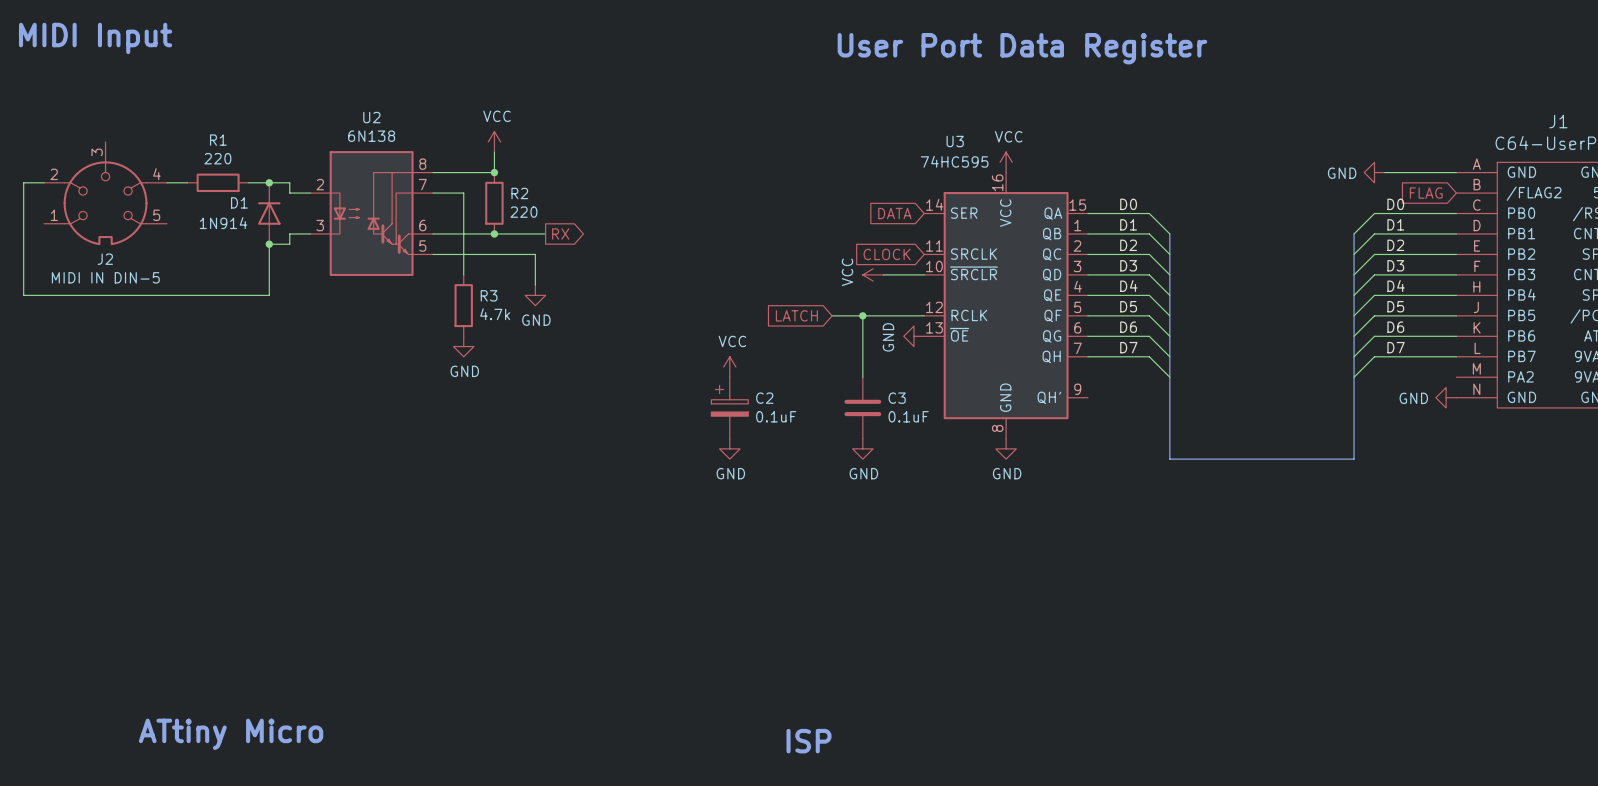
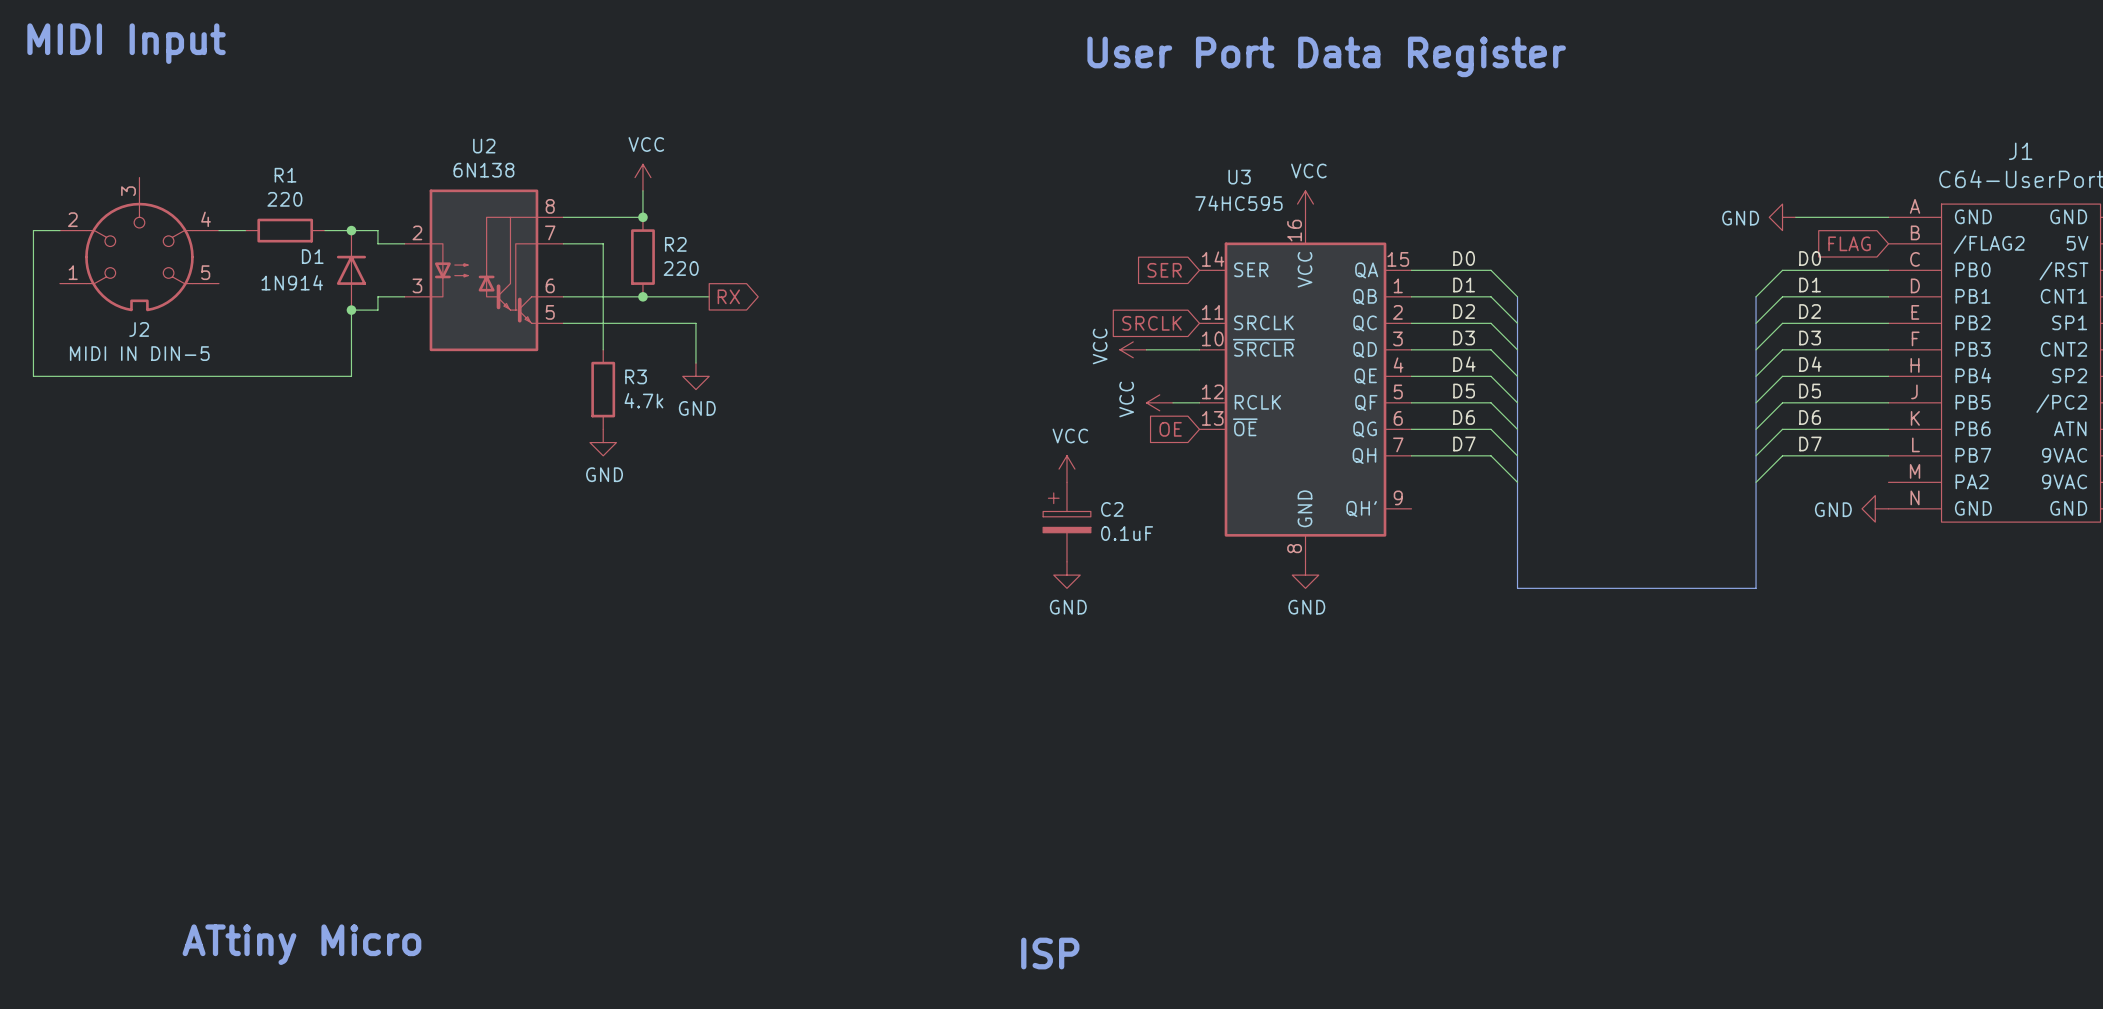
global label: DATA (894, 213) -> SER (1164, 270)
global label: CLOCK (887, 254) -> SRCLK (1151, 323)
global label: LATCH (796, 315) -> none
wire: (832, 315) (903, 315) -> none
wire: (862, 315) (862, 377) -> none
junction: (862, 315) -> none
power symbol: none -> VCC (1159, 402)
global label: none -> OE (1170, 429)
power symbol: GND (914, 336) -> none
power symbol: VCC (729, 367) -> none
power symbol: none -> VCC (1066, 469)
C2 position: (729, 407) -> (1066, 522)
C3: 0.1uF (862, 407) -> none
power symbol: GND (729, 448) -> none
power symbol position: GND (862, 448) -> GND (1066, 575)

